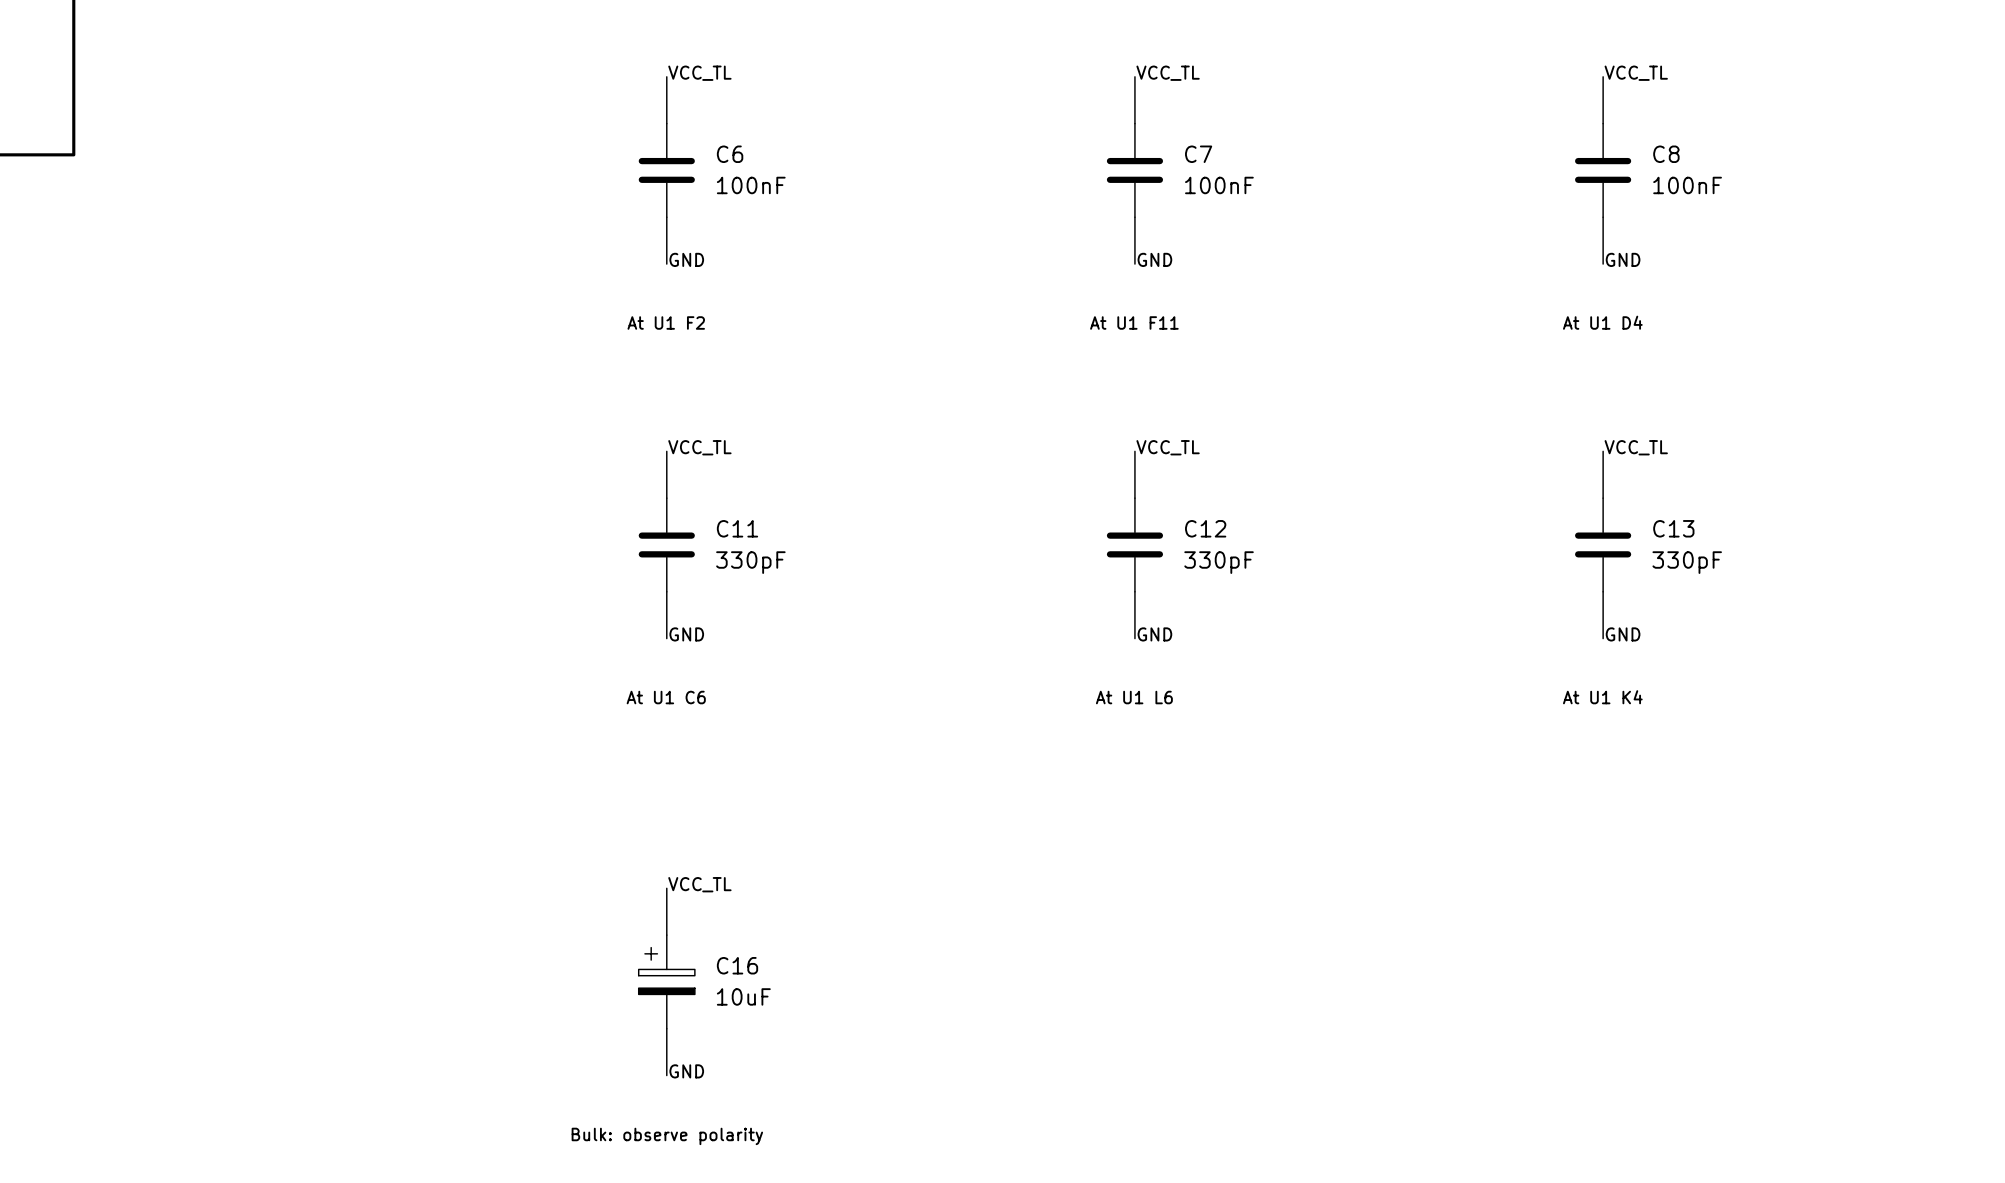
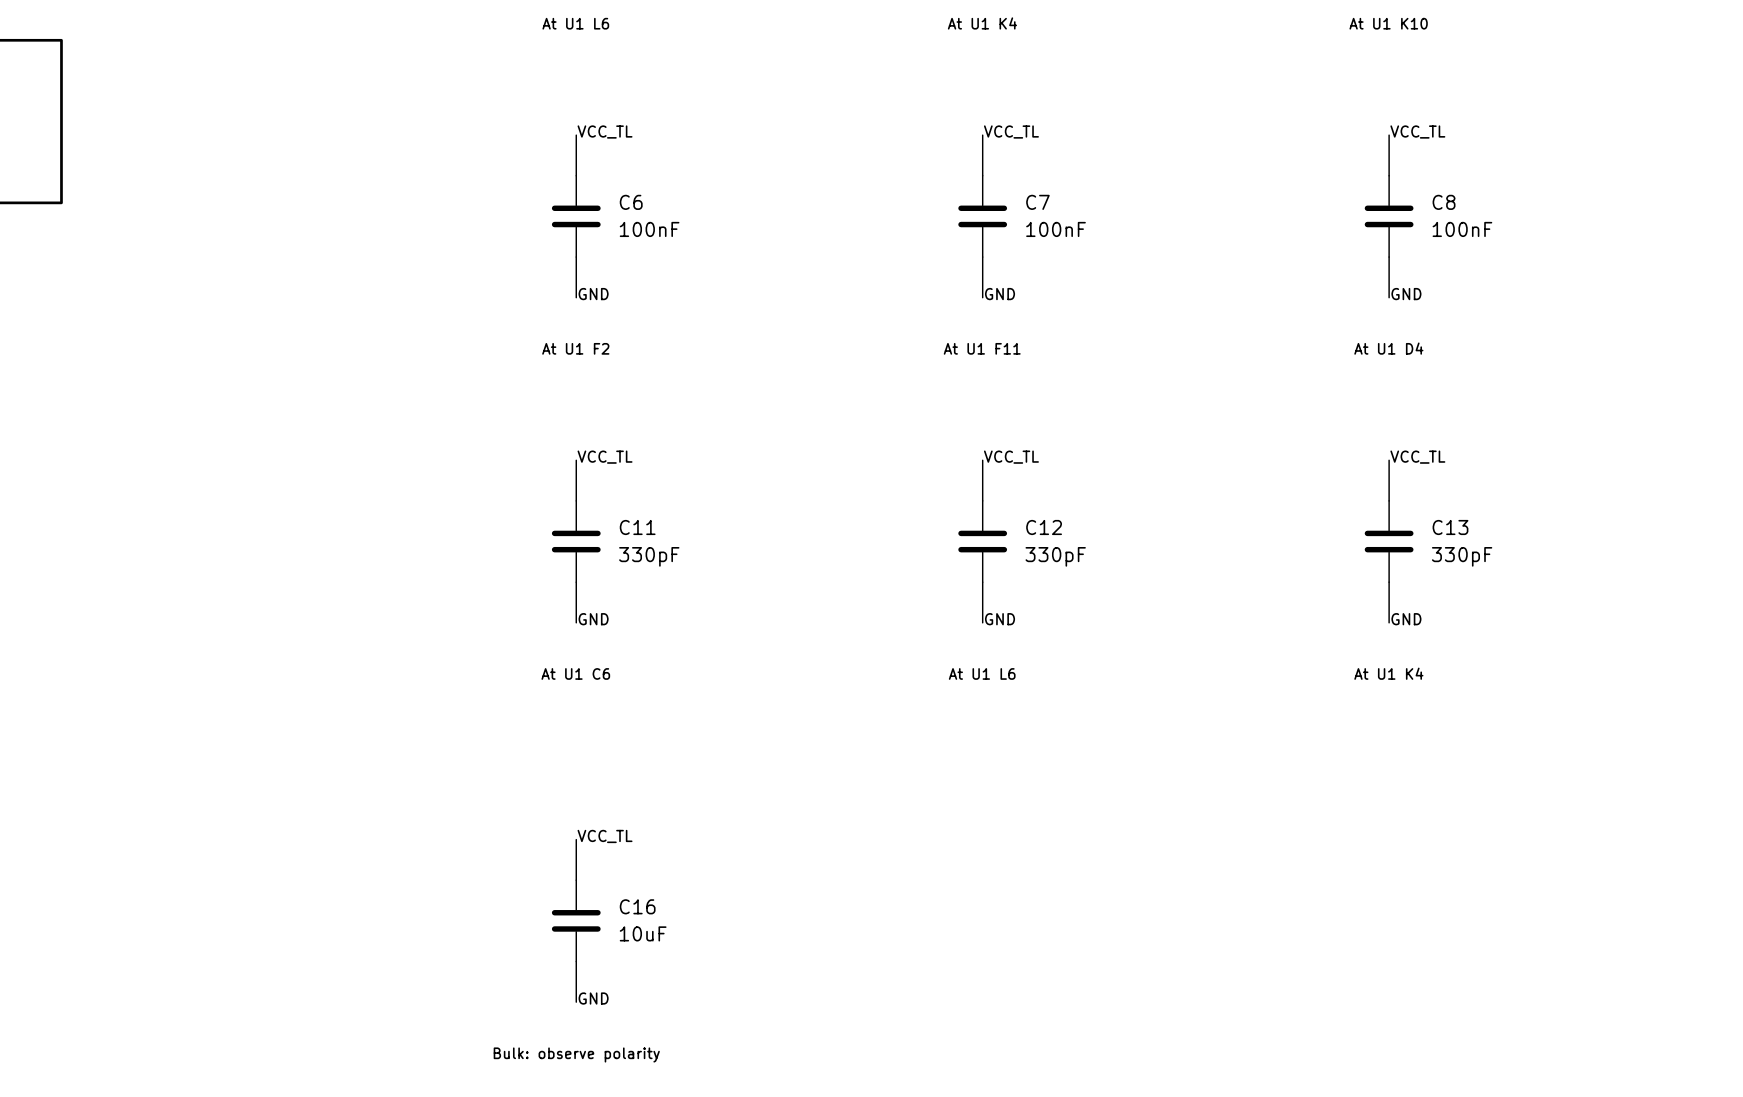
C16 symbol: [638, 935, 695, 1029] -> [551, 880, 601, 962]

